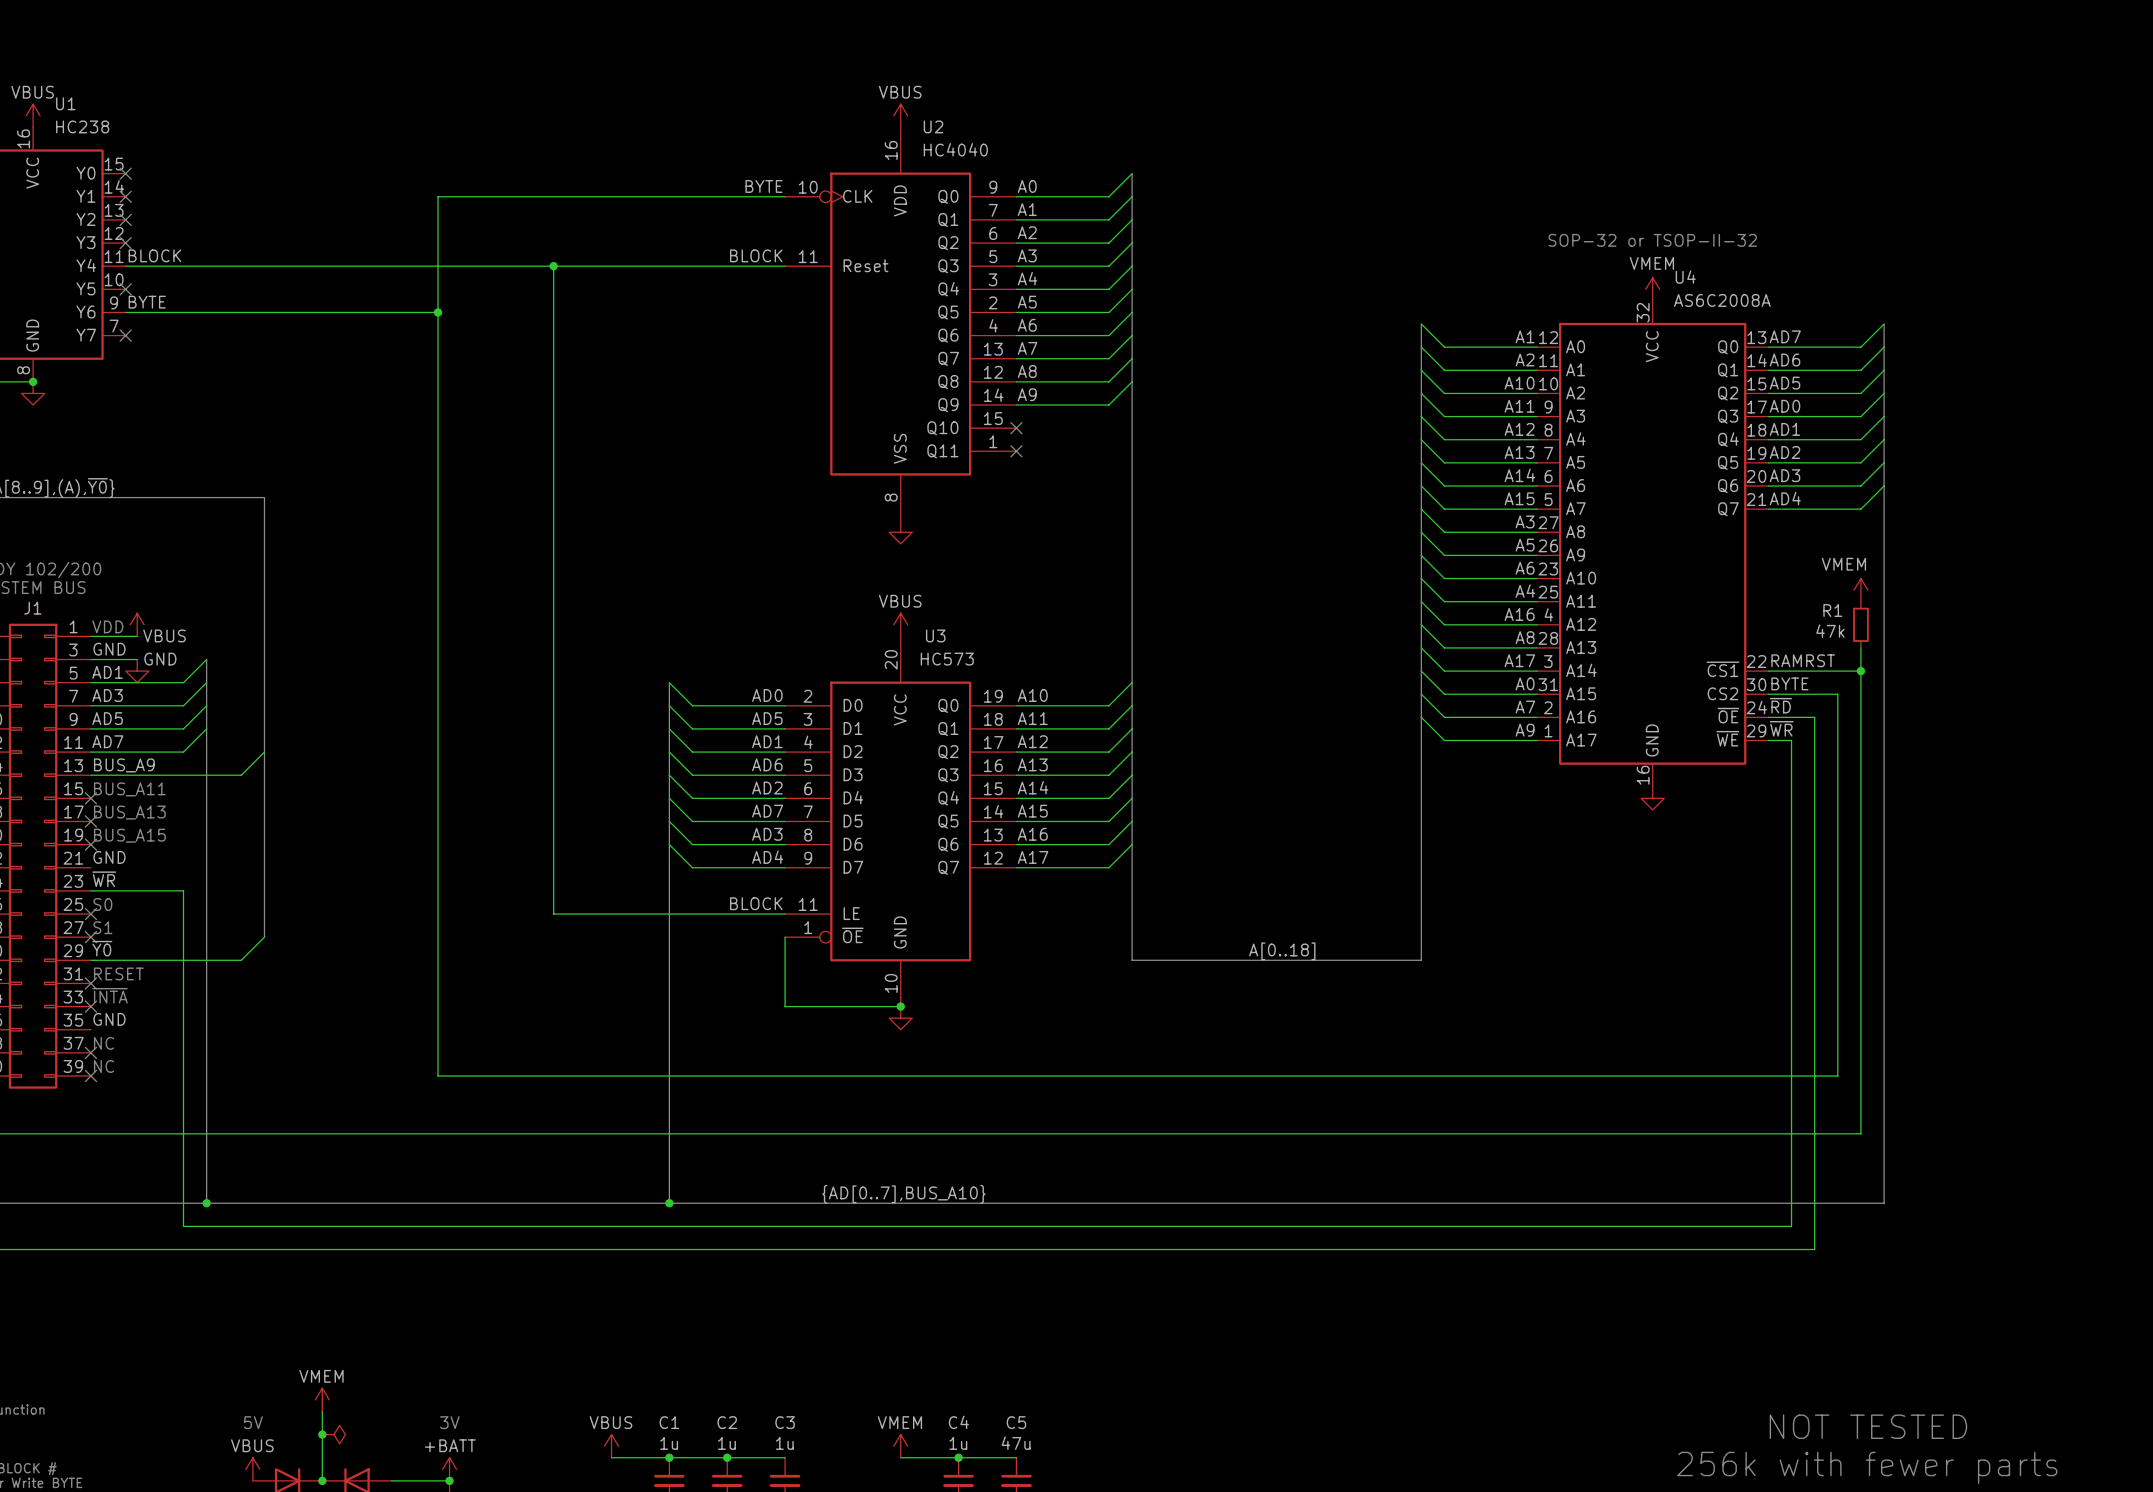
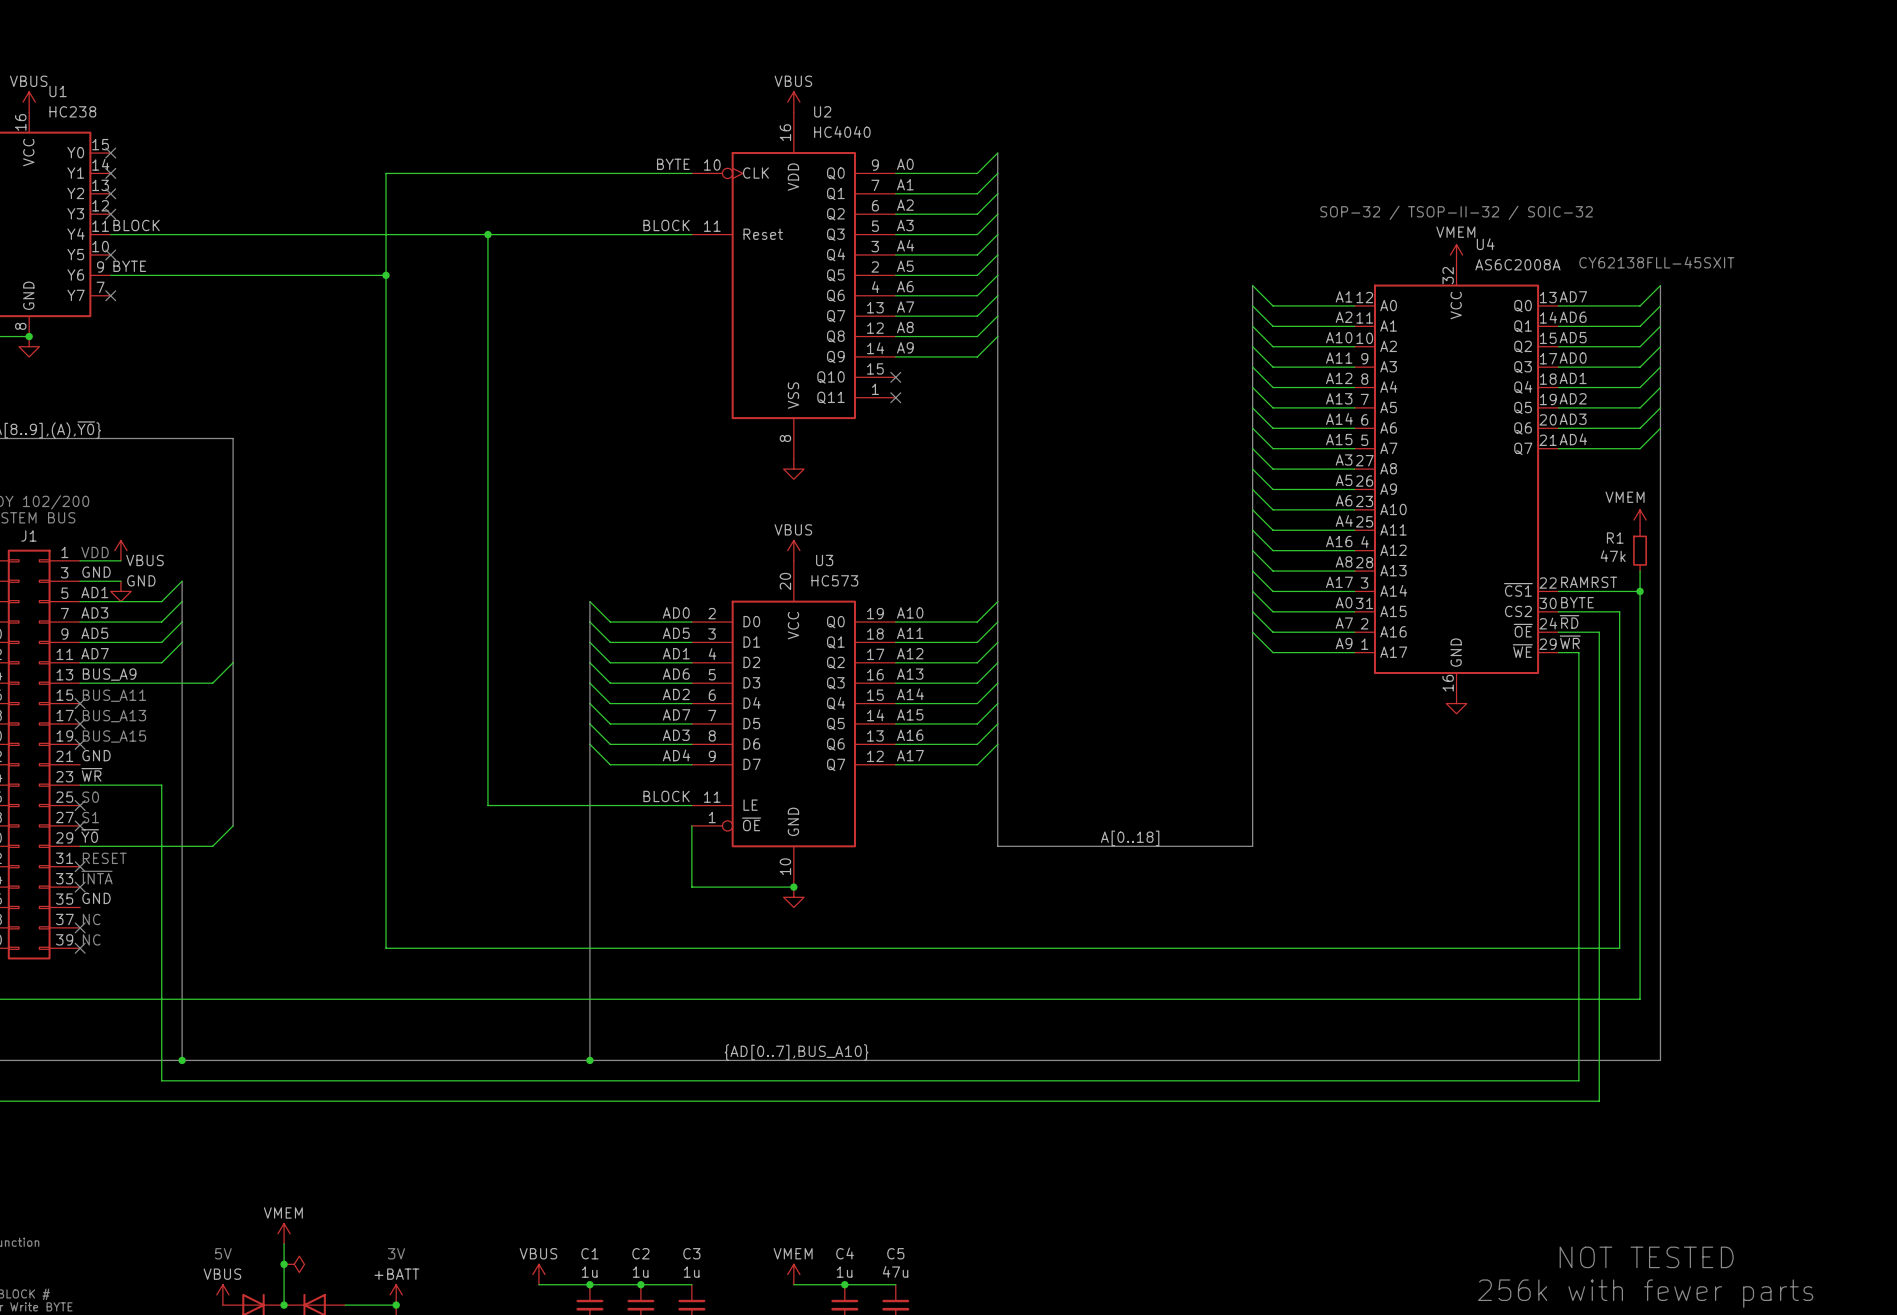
text: SOP-32 or TSOP-II-32 (1652, 240) -> SOP-32 / TSOP-II-32 / SOIC-32 (1456, 212)
text: none -> CY62138FLL-45SXIT (1656, 262)

